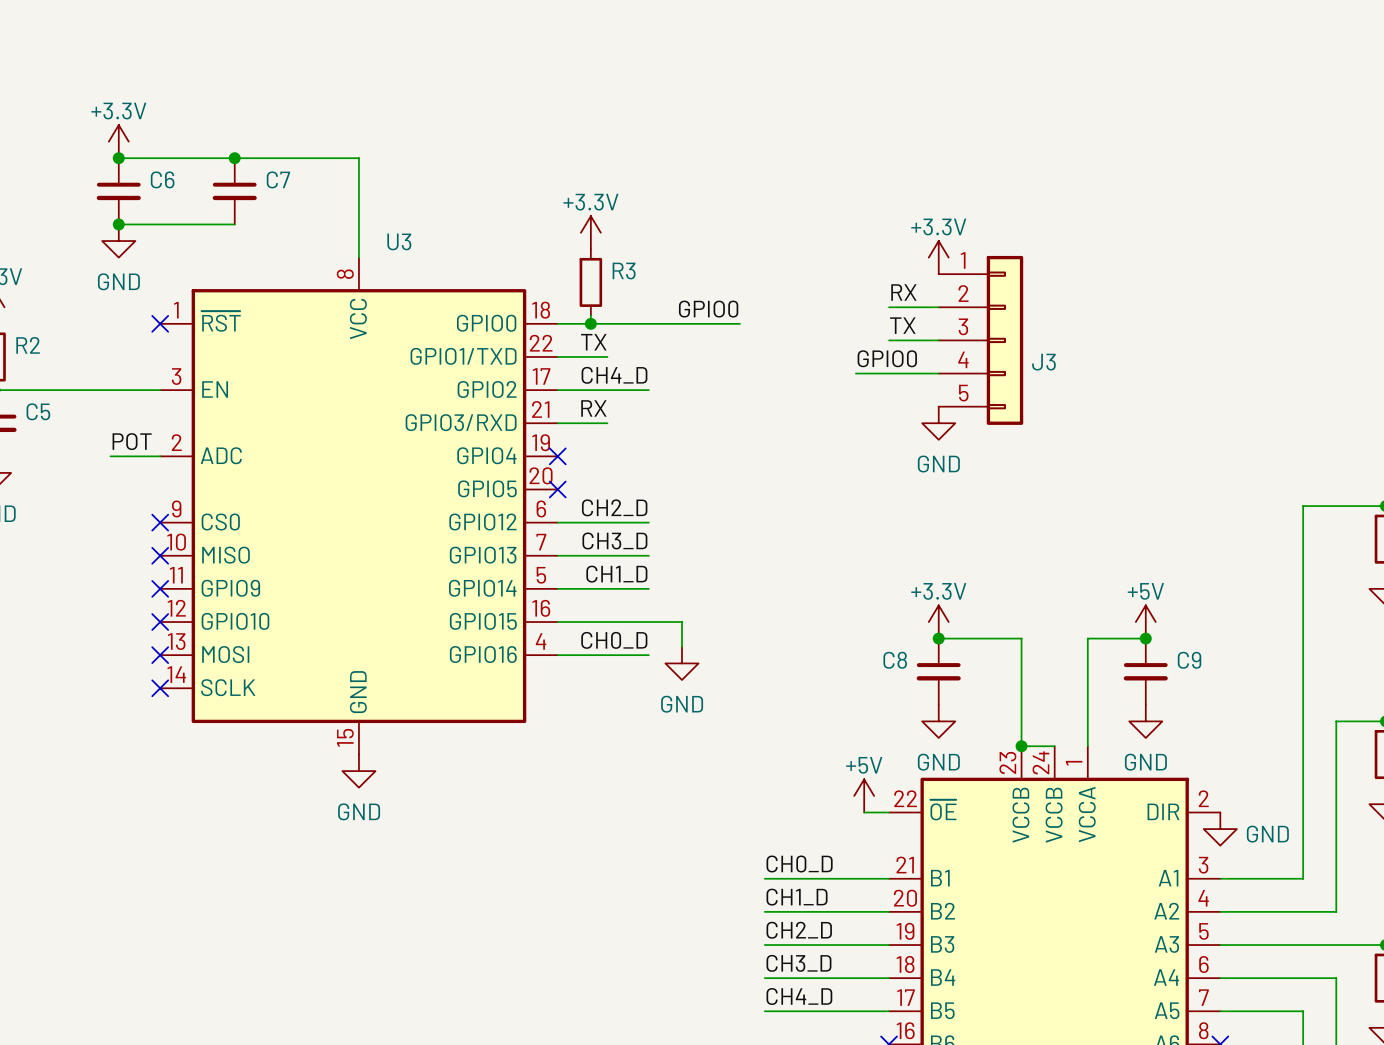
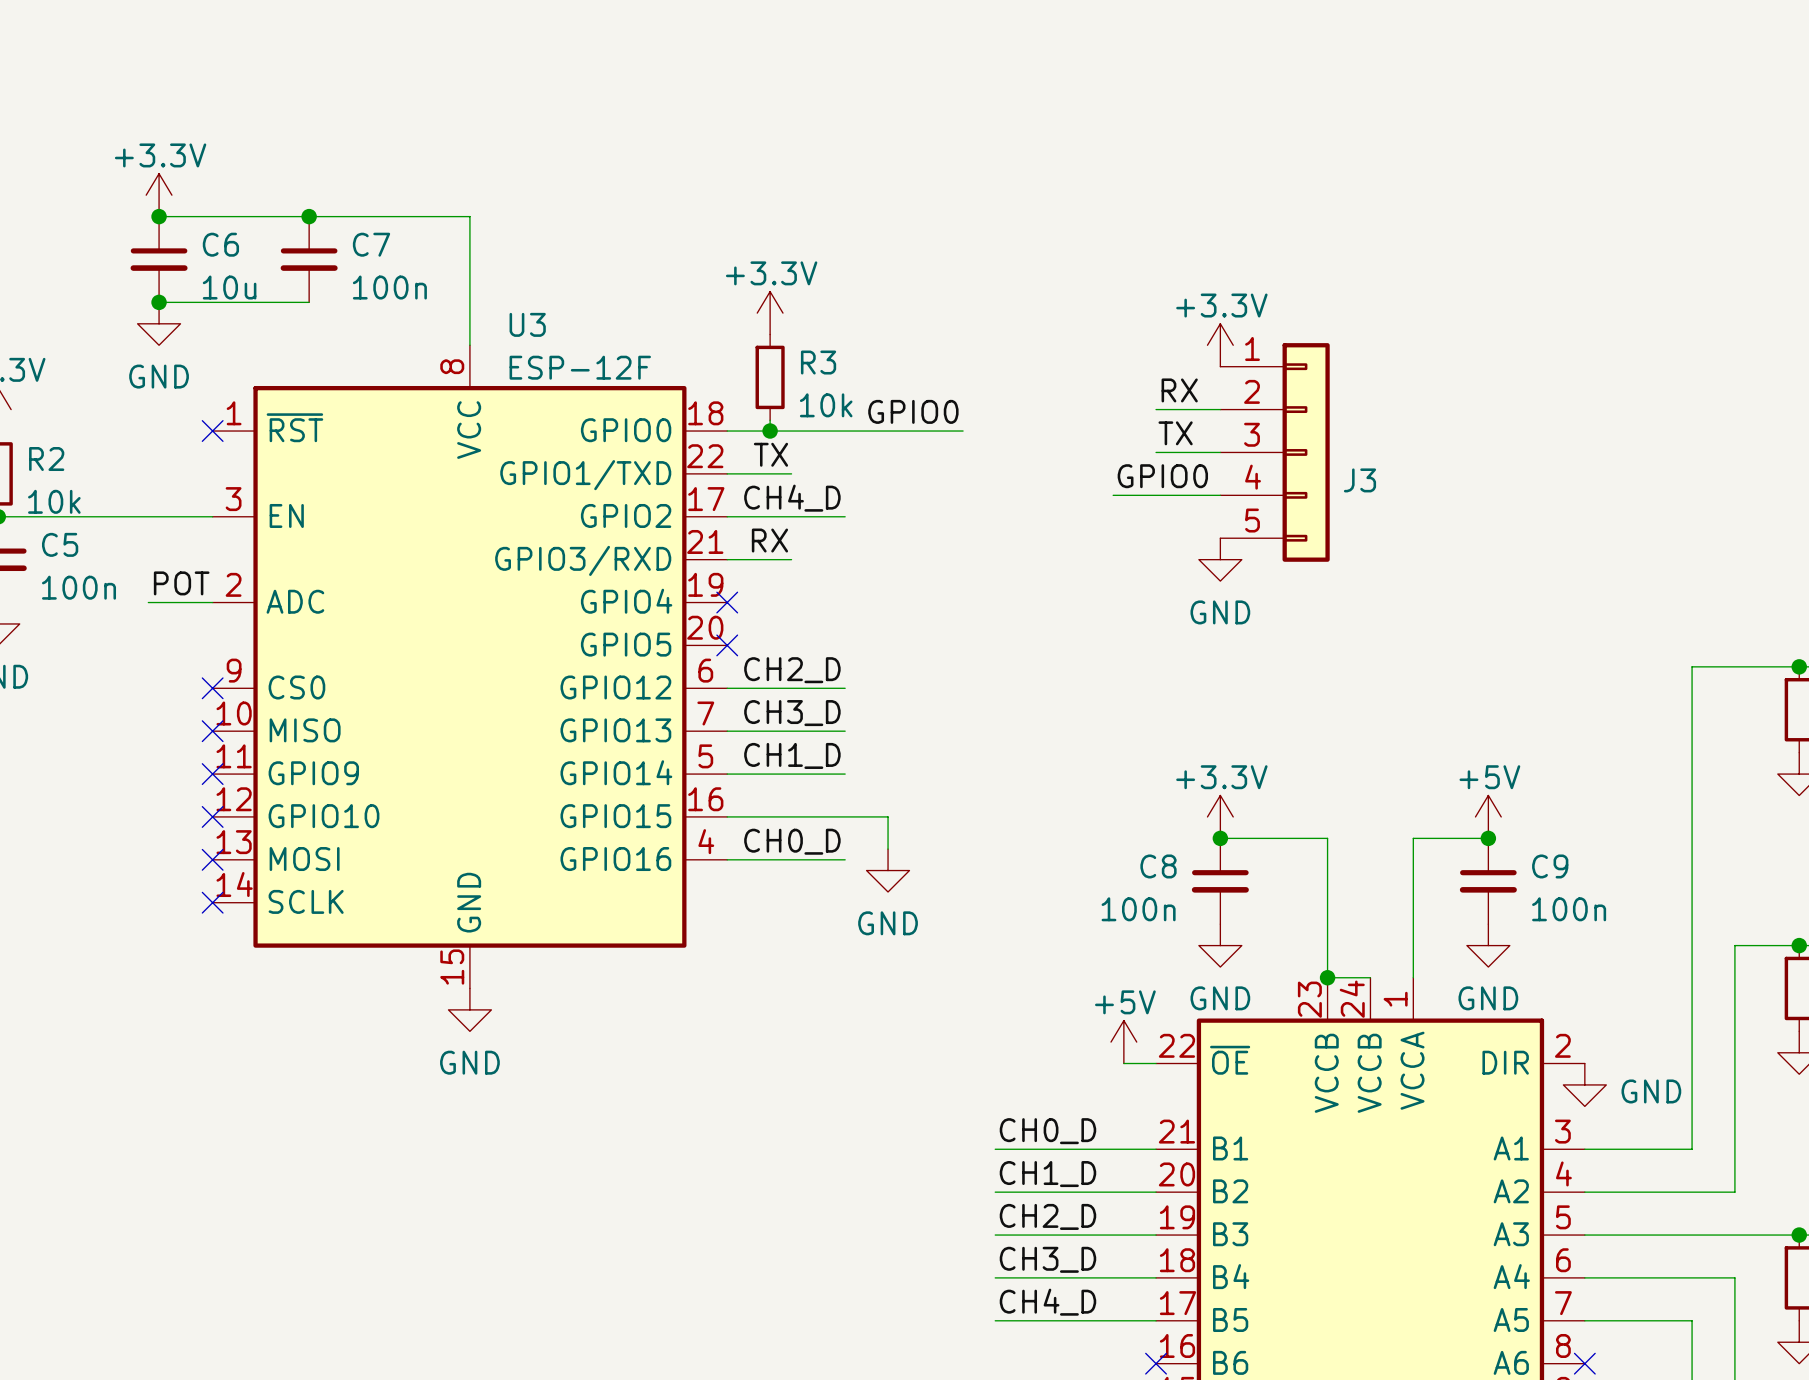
C6 value: none -> 10u (229, 287)
C7 value: none -> 100n (389, 287)
U3 value: none -> ESP-12F (580, 367)
R3 value: none -> 10k (826, 405)
R2 value: none -> 10k (54, 501)
C5 value: none -> 100n (79, 587)
C8 value: none -> 100n (1138, 909)
C9 value: none -> 100n (1569, 909)

